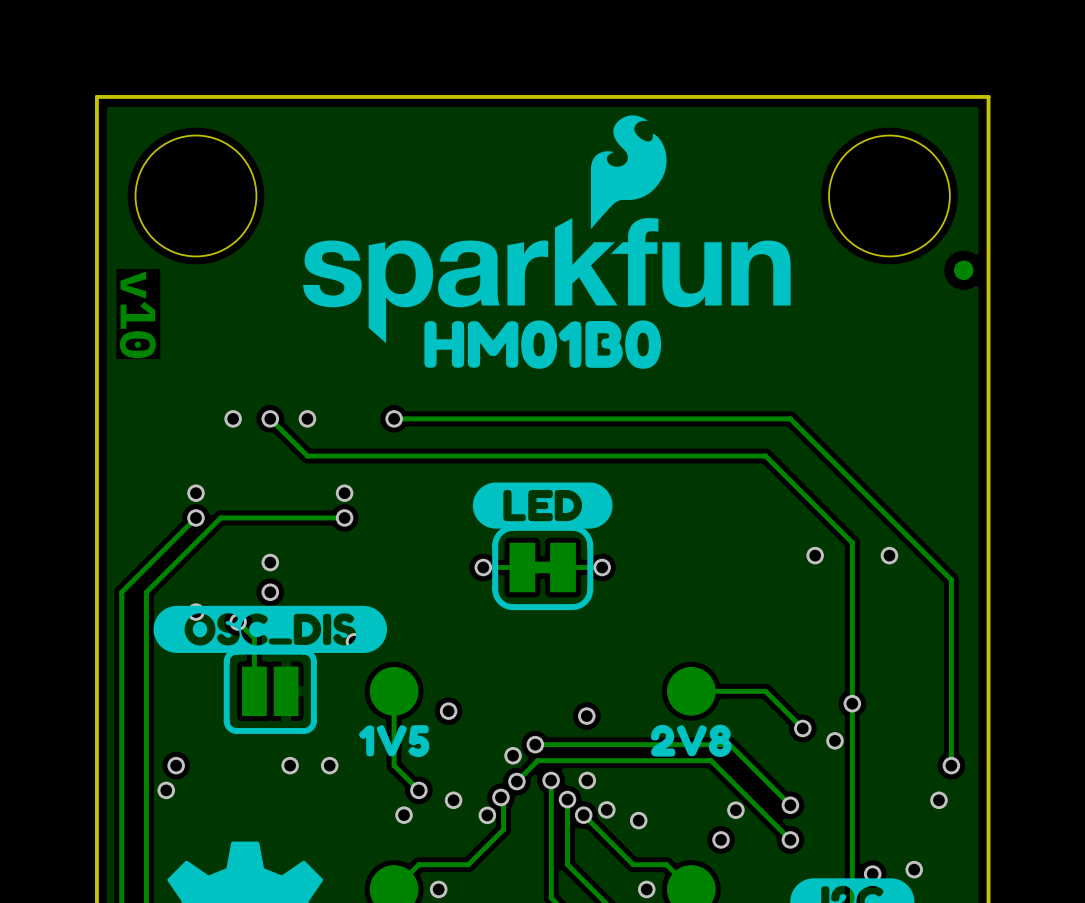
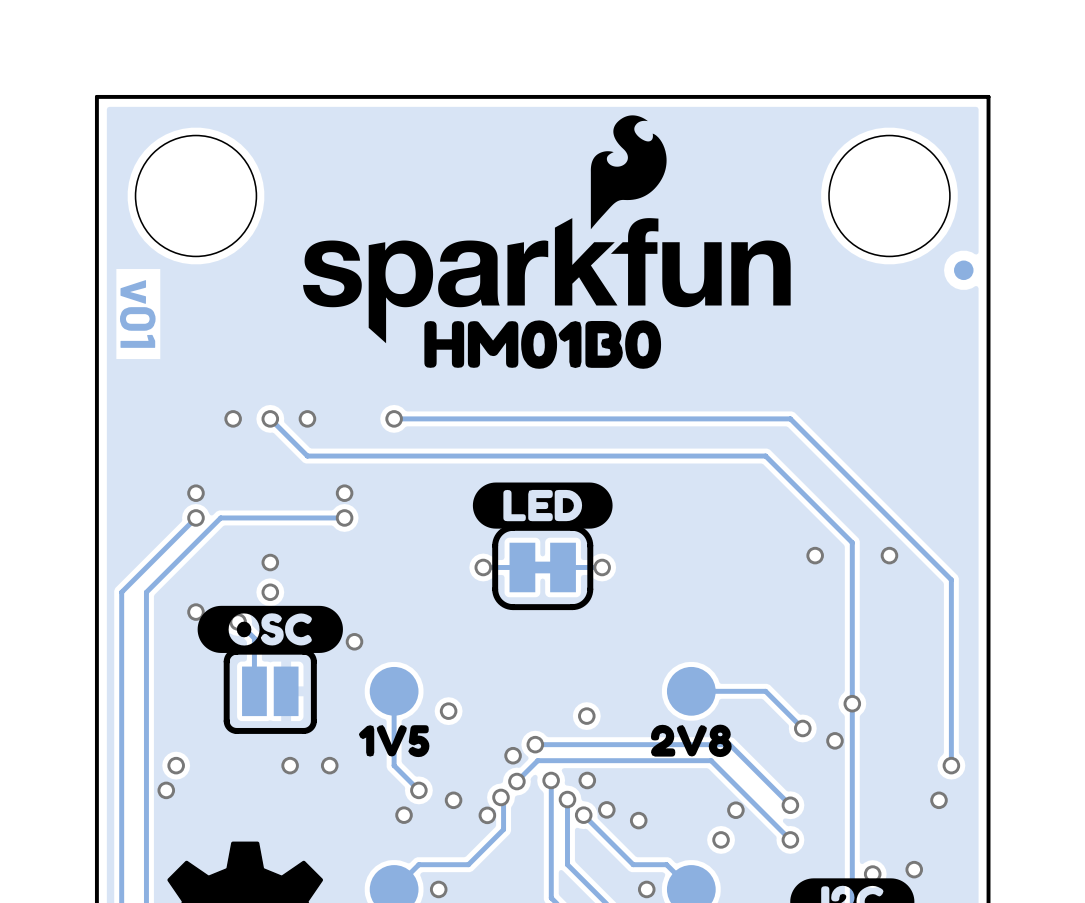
text: v10 (137, 314) -> v01 (137, 314)
drawing shape: [153, 605, 388, 653] -> [197, 605, 343, 653]

